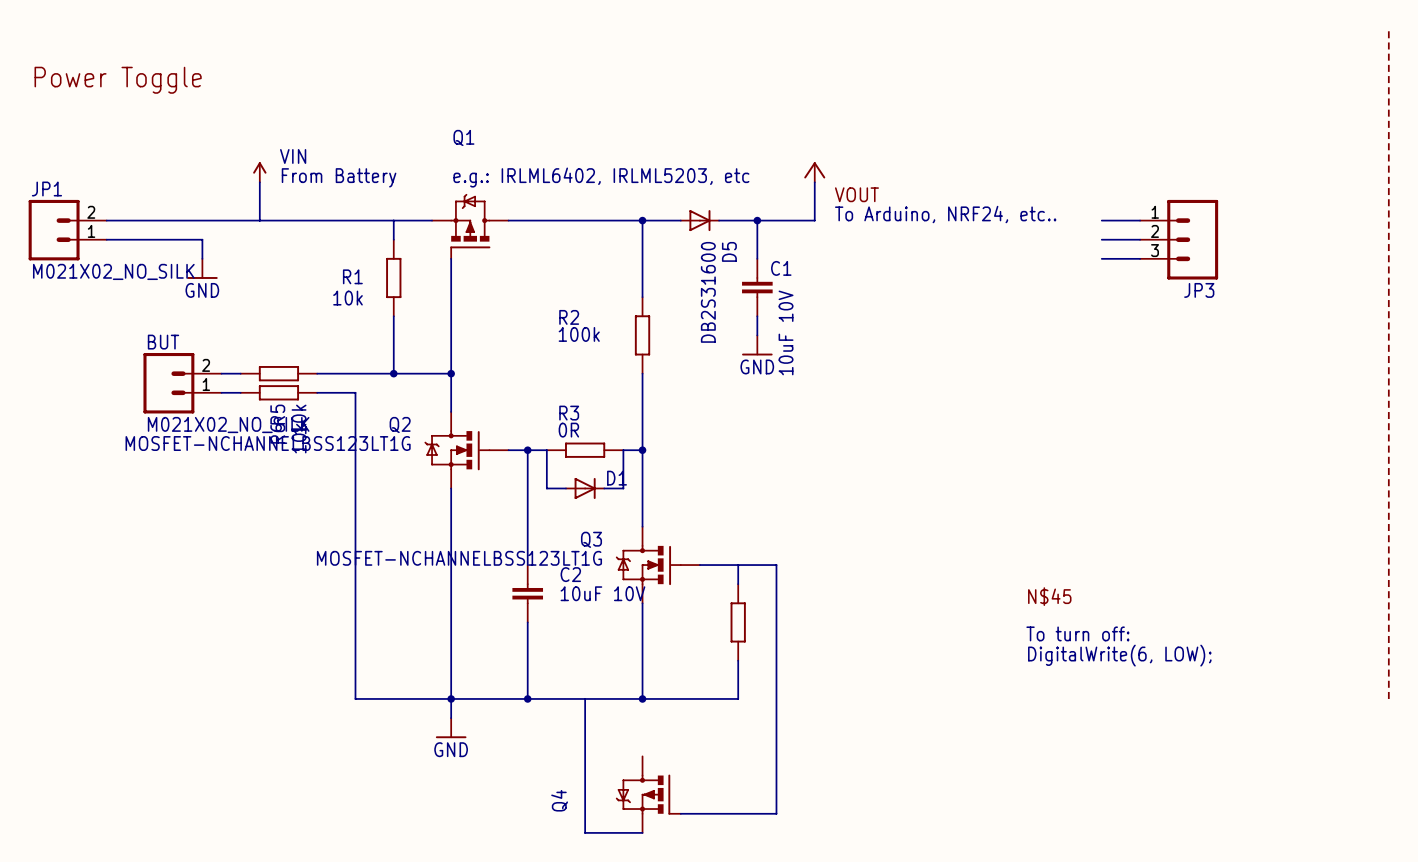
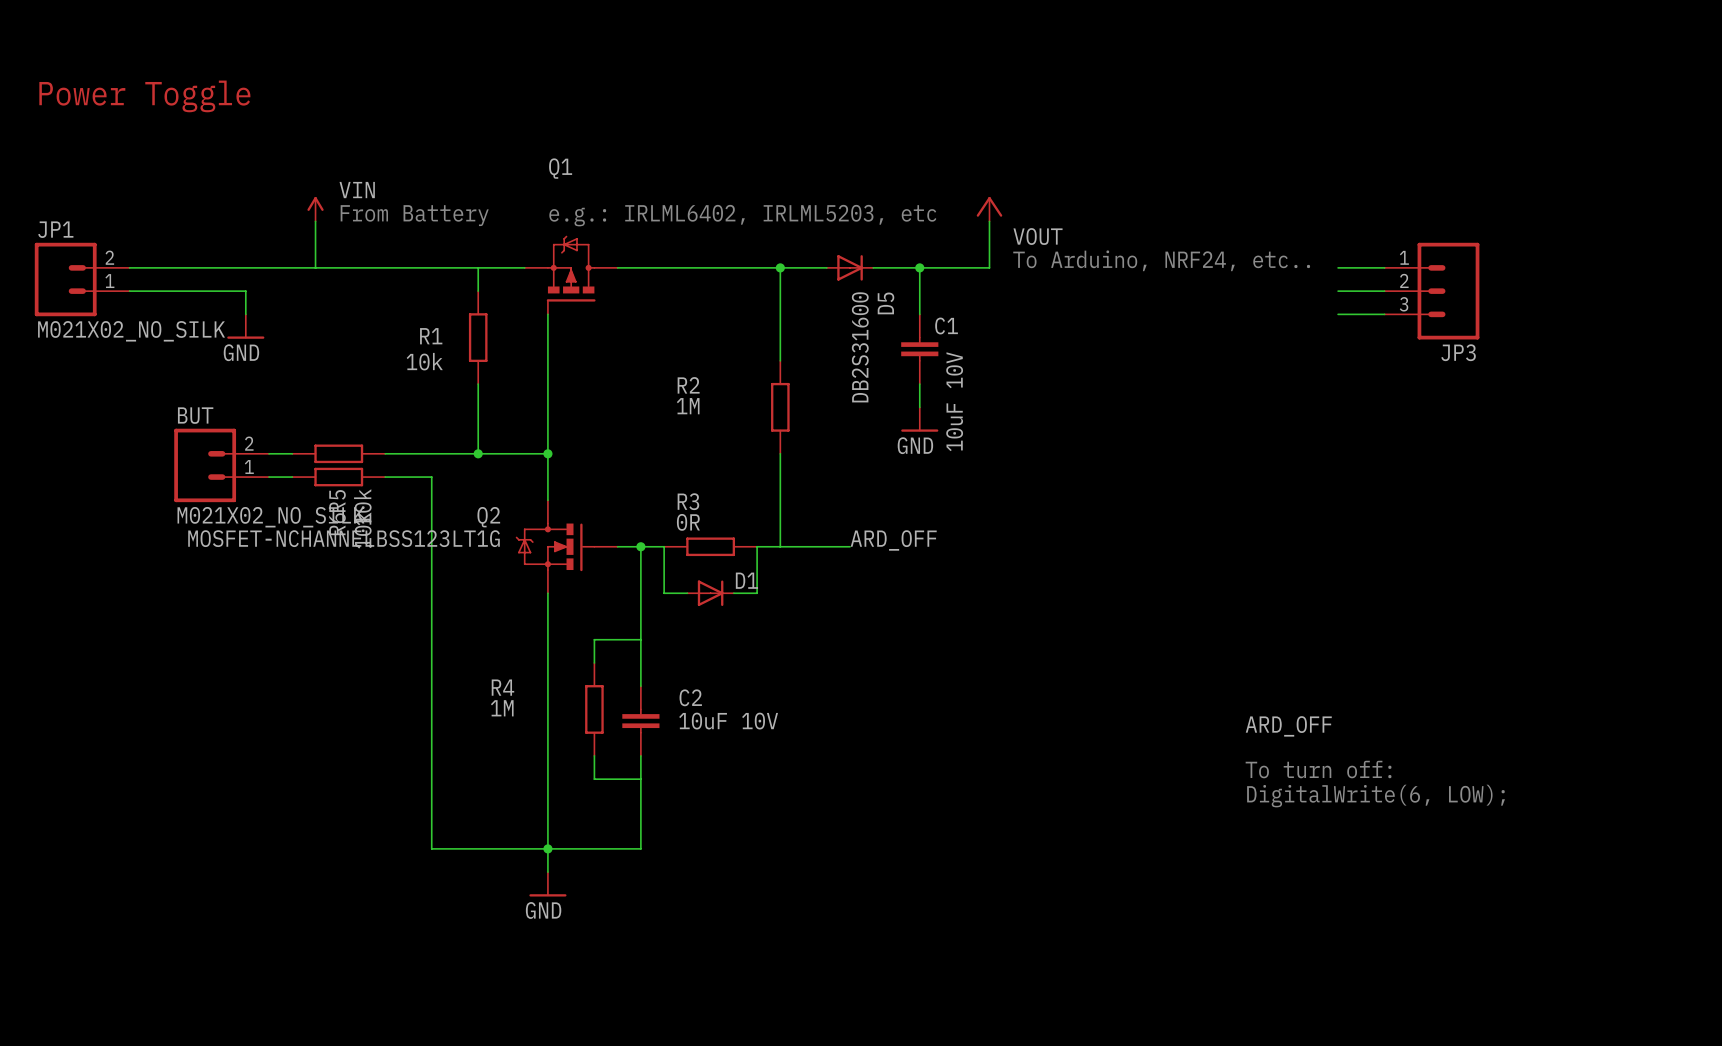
line: (1388, 29) (1388, 698) -> none
R2 value: 100k (579, 334) -> 1M (688, 406)
label: none -> ARD_OFF (893, 540)
wire: (642, 450) (642, 526) -> (780, 546) (850, 546)
junction: (642, 450) -> none
wire: none -> (640, 639) (594, 639) (594, 662)
Q3: MOSFET-NCHANNELBSS123LT1G (658, 565) -> none
wire: (699, 565) (776, 565) (776, 813) (680, 813) -> none
wire: (738, 565) (738, 584) -> none
R4: none -> 1M (594, 709)
label: N$45 (1049, 596) -> ARD_OFF (1288, 726)
wire: (642, 603) (642, 698) -> none
wire: none -> (594, 755) (594, 779) (640, 779)
part: (738, 622) -> none
wire: (738, 660) (738, 698) (527, 698) -> none
junction: (527, 698) -> none
wire: (585, 698) (585, 832) (642, 832) -> none
junction: (642, 698) -> none
Q4: (648, 794) -> none

